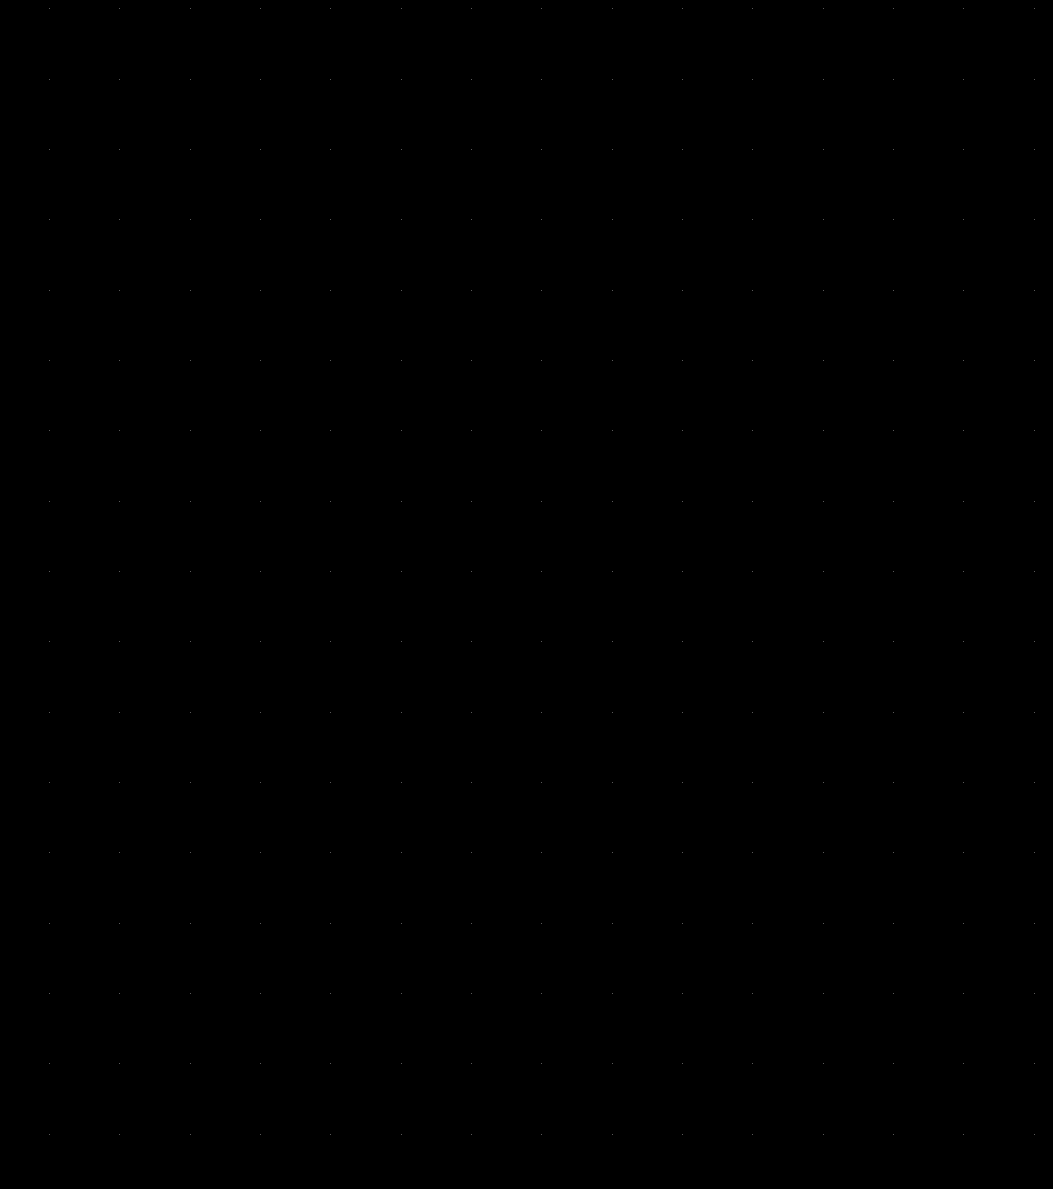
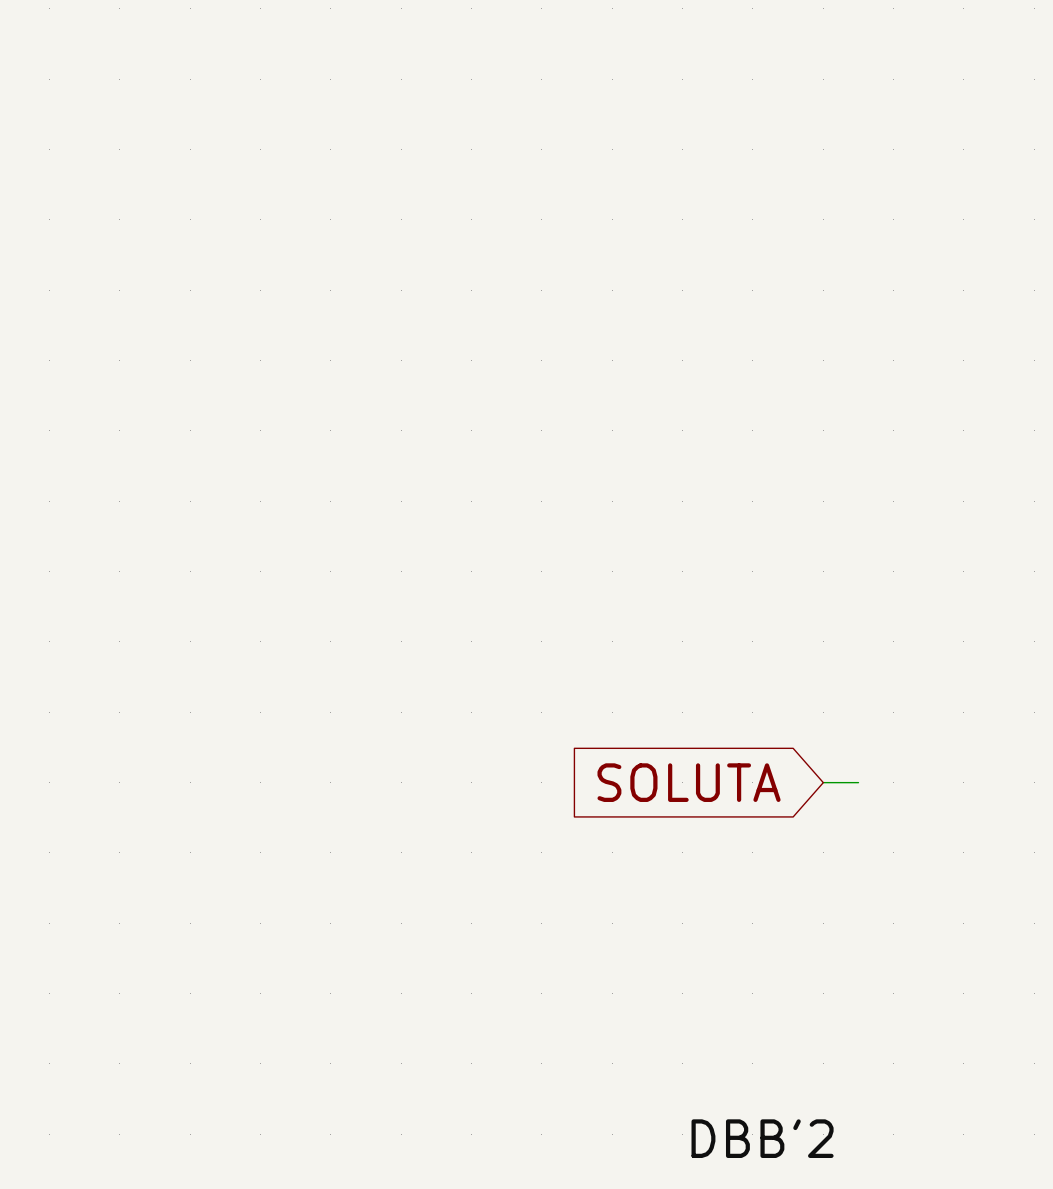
global label: none -> SOLUTA (689, 782)
wire: none -> (823, 782) (858, 782)
label: none -> DBB'2 (762, 1138)

